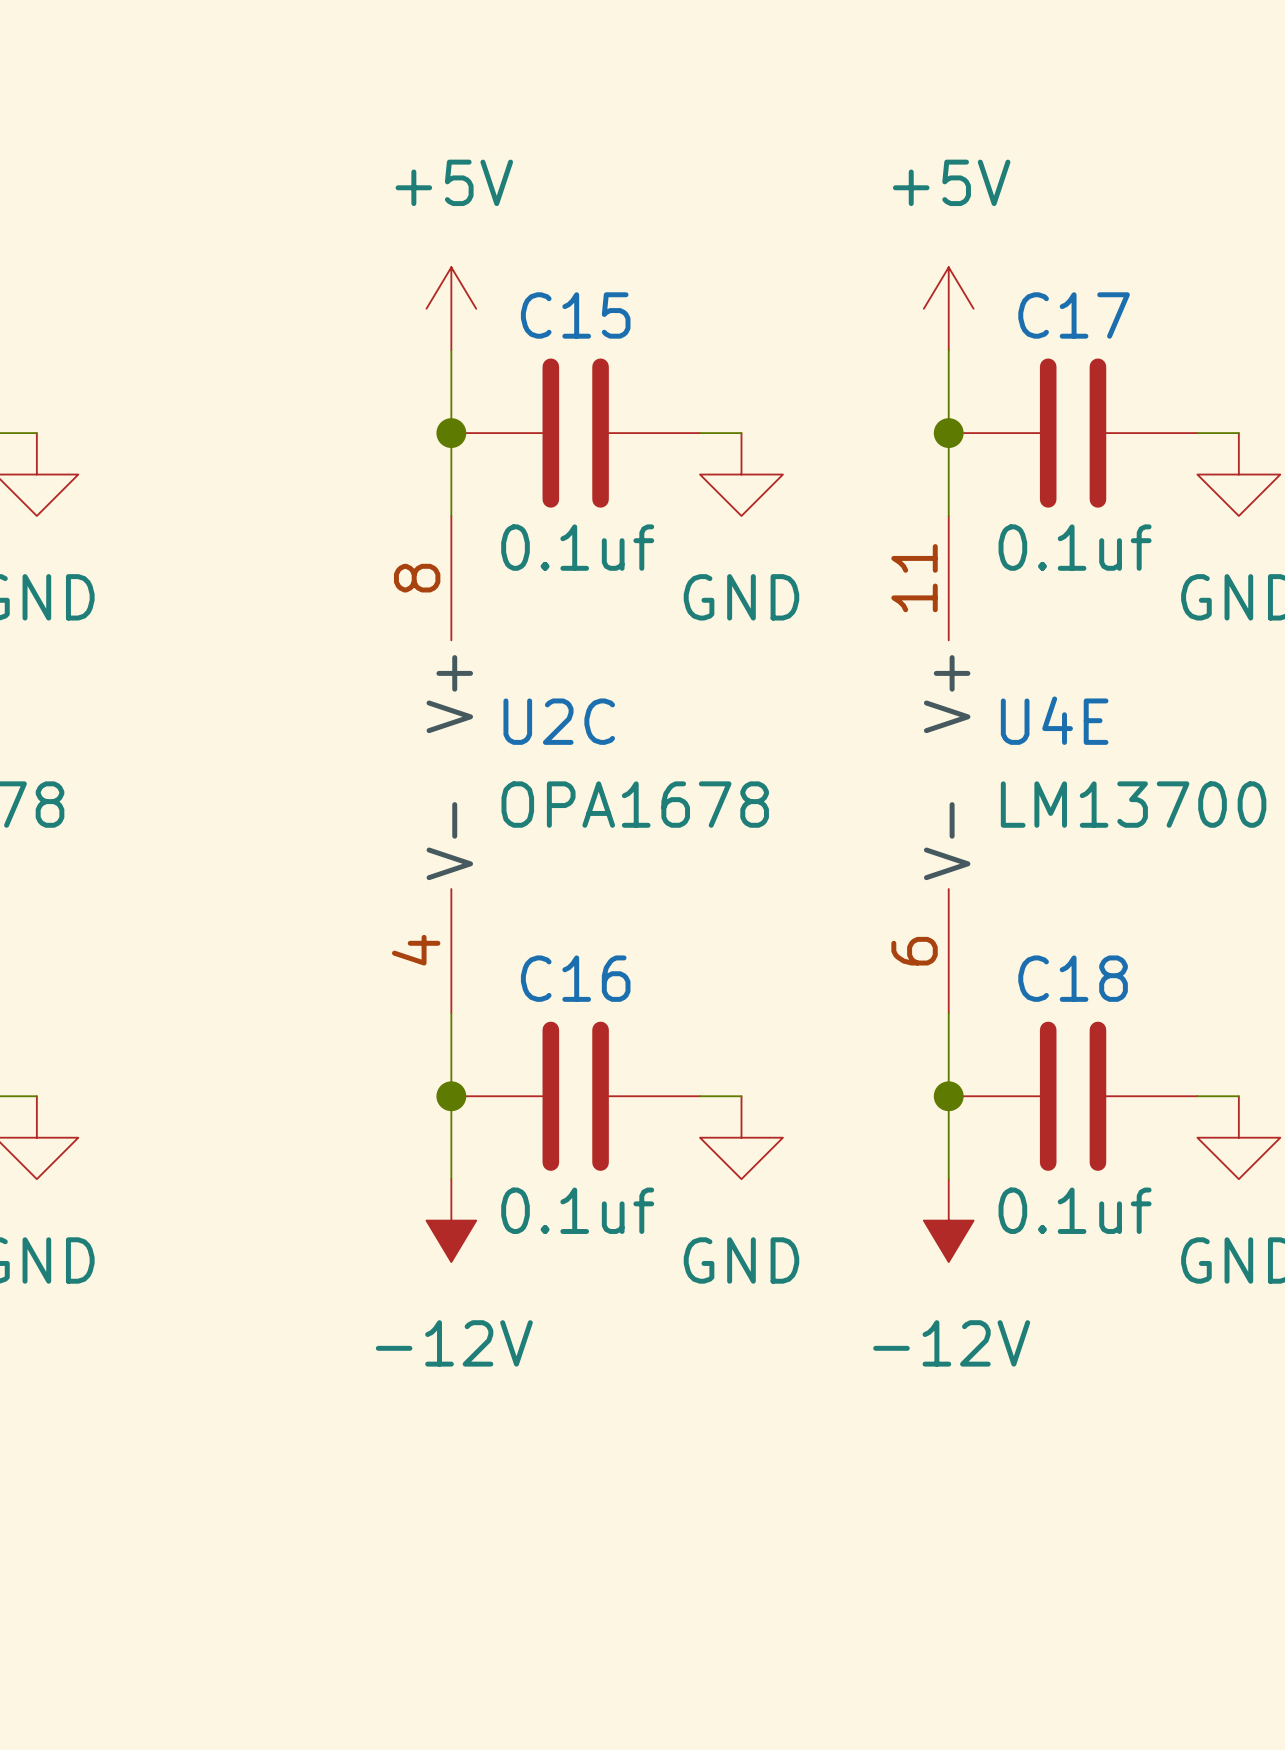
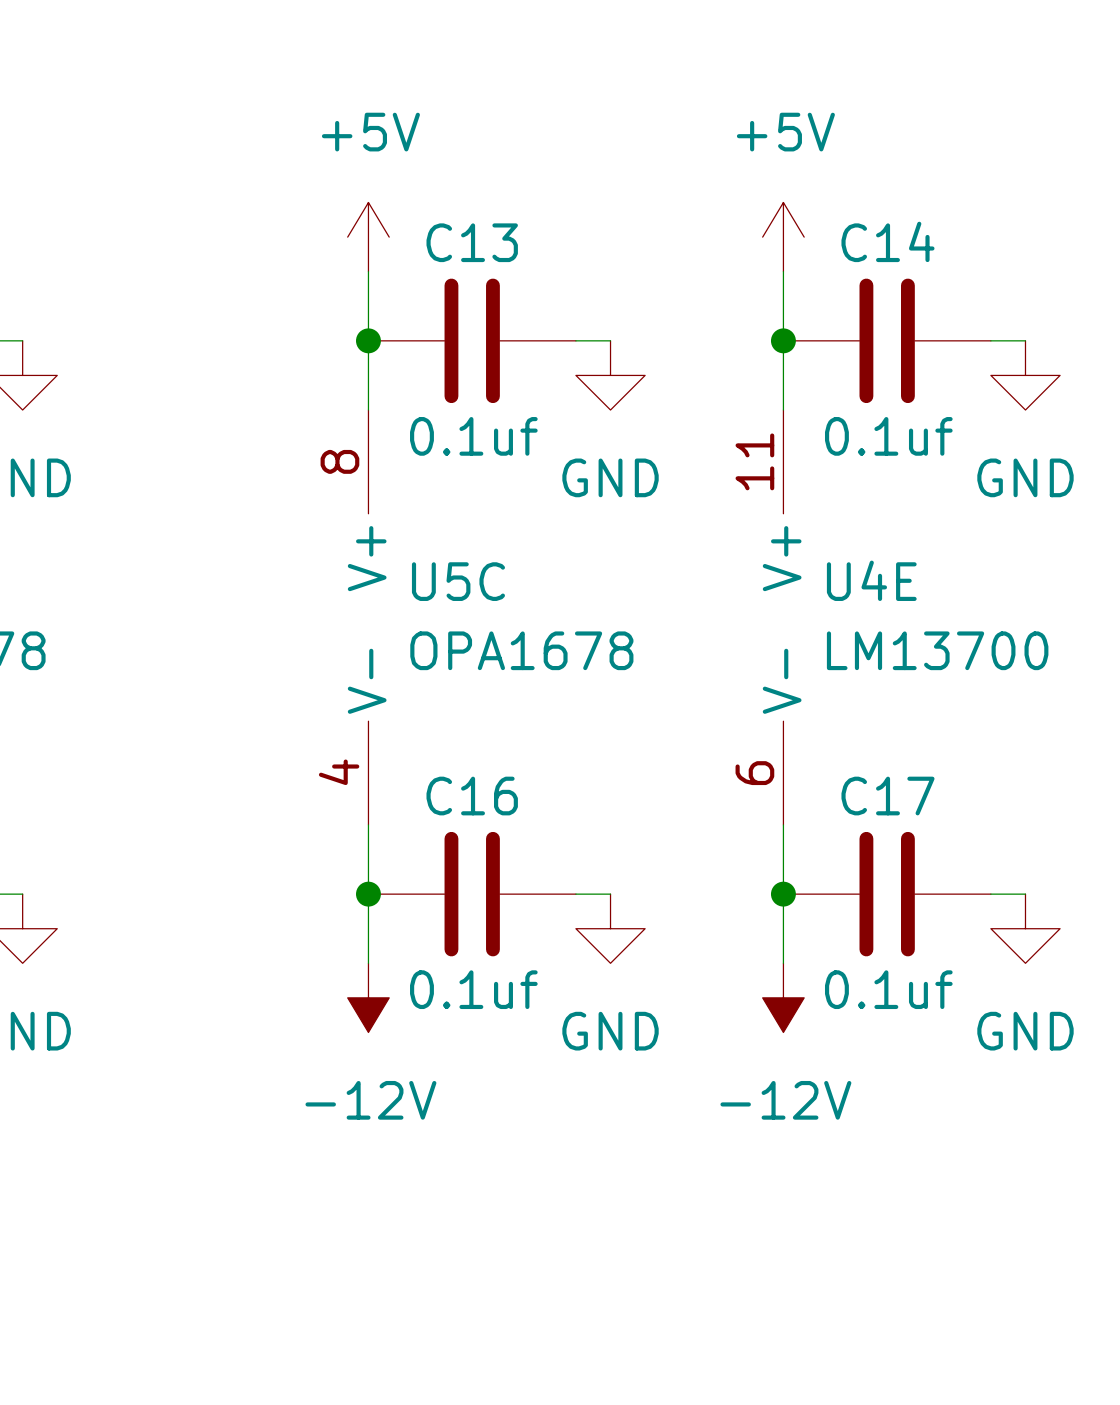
C15 name: C15 (575, 315) -> C13 (472, 242)
C17 name: C17 (1074, 315) -> C14 (887, 241)
U2C name: U2C (559, 721) -> U5C (458, 581)
C18 name: C18 (1073, 978) -> C17 (887, 796)

